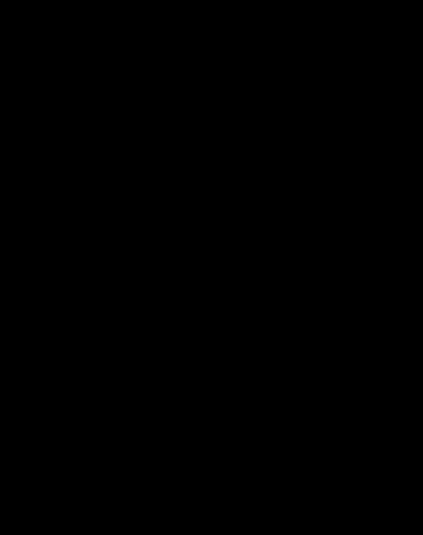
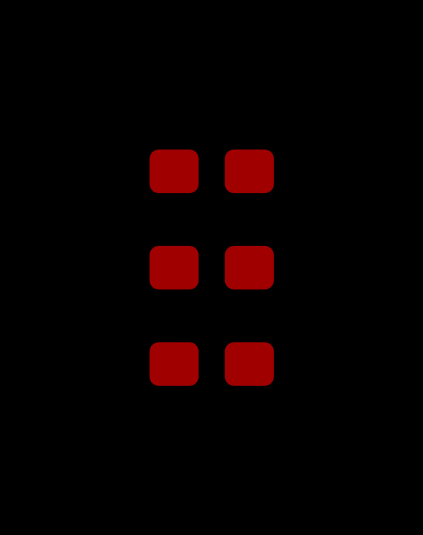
part: none -> (211, 171)
part: none -> (211, 267)
part: none -> (211, 364)

